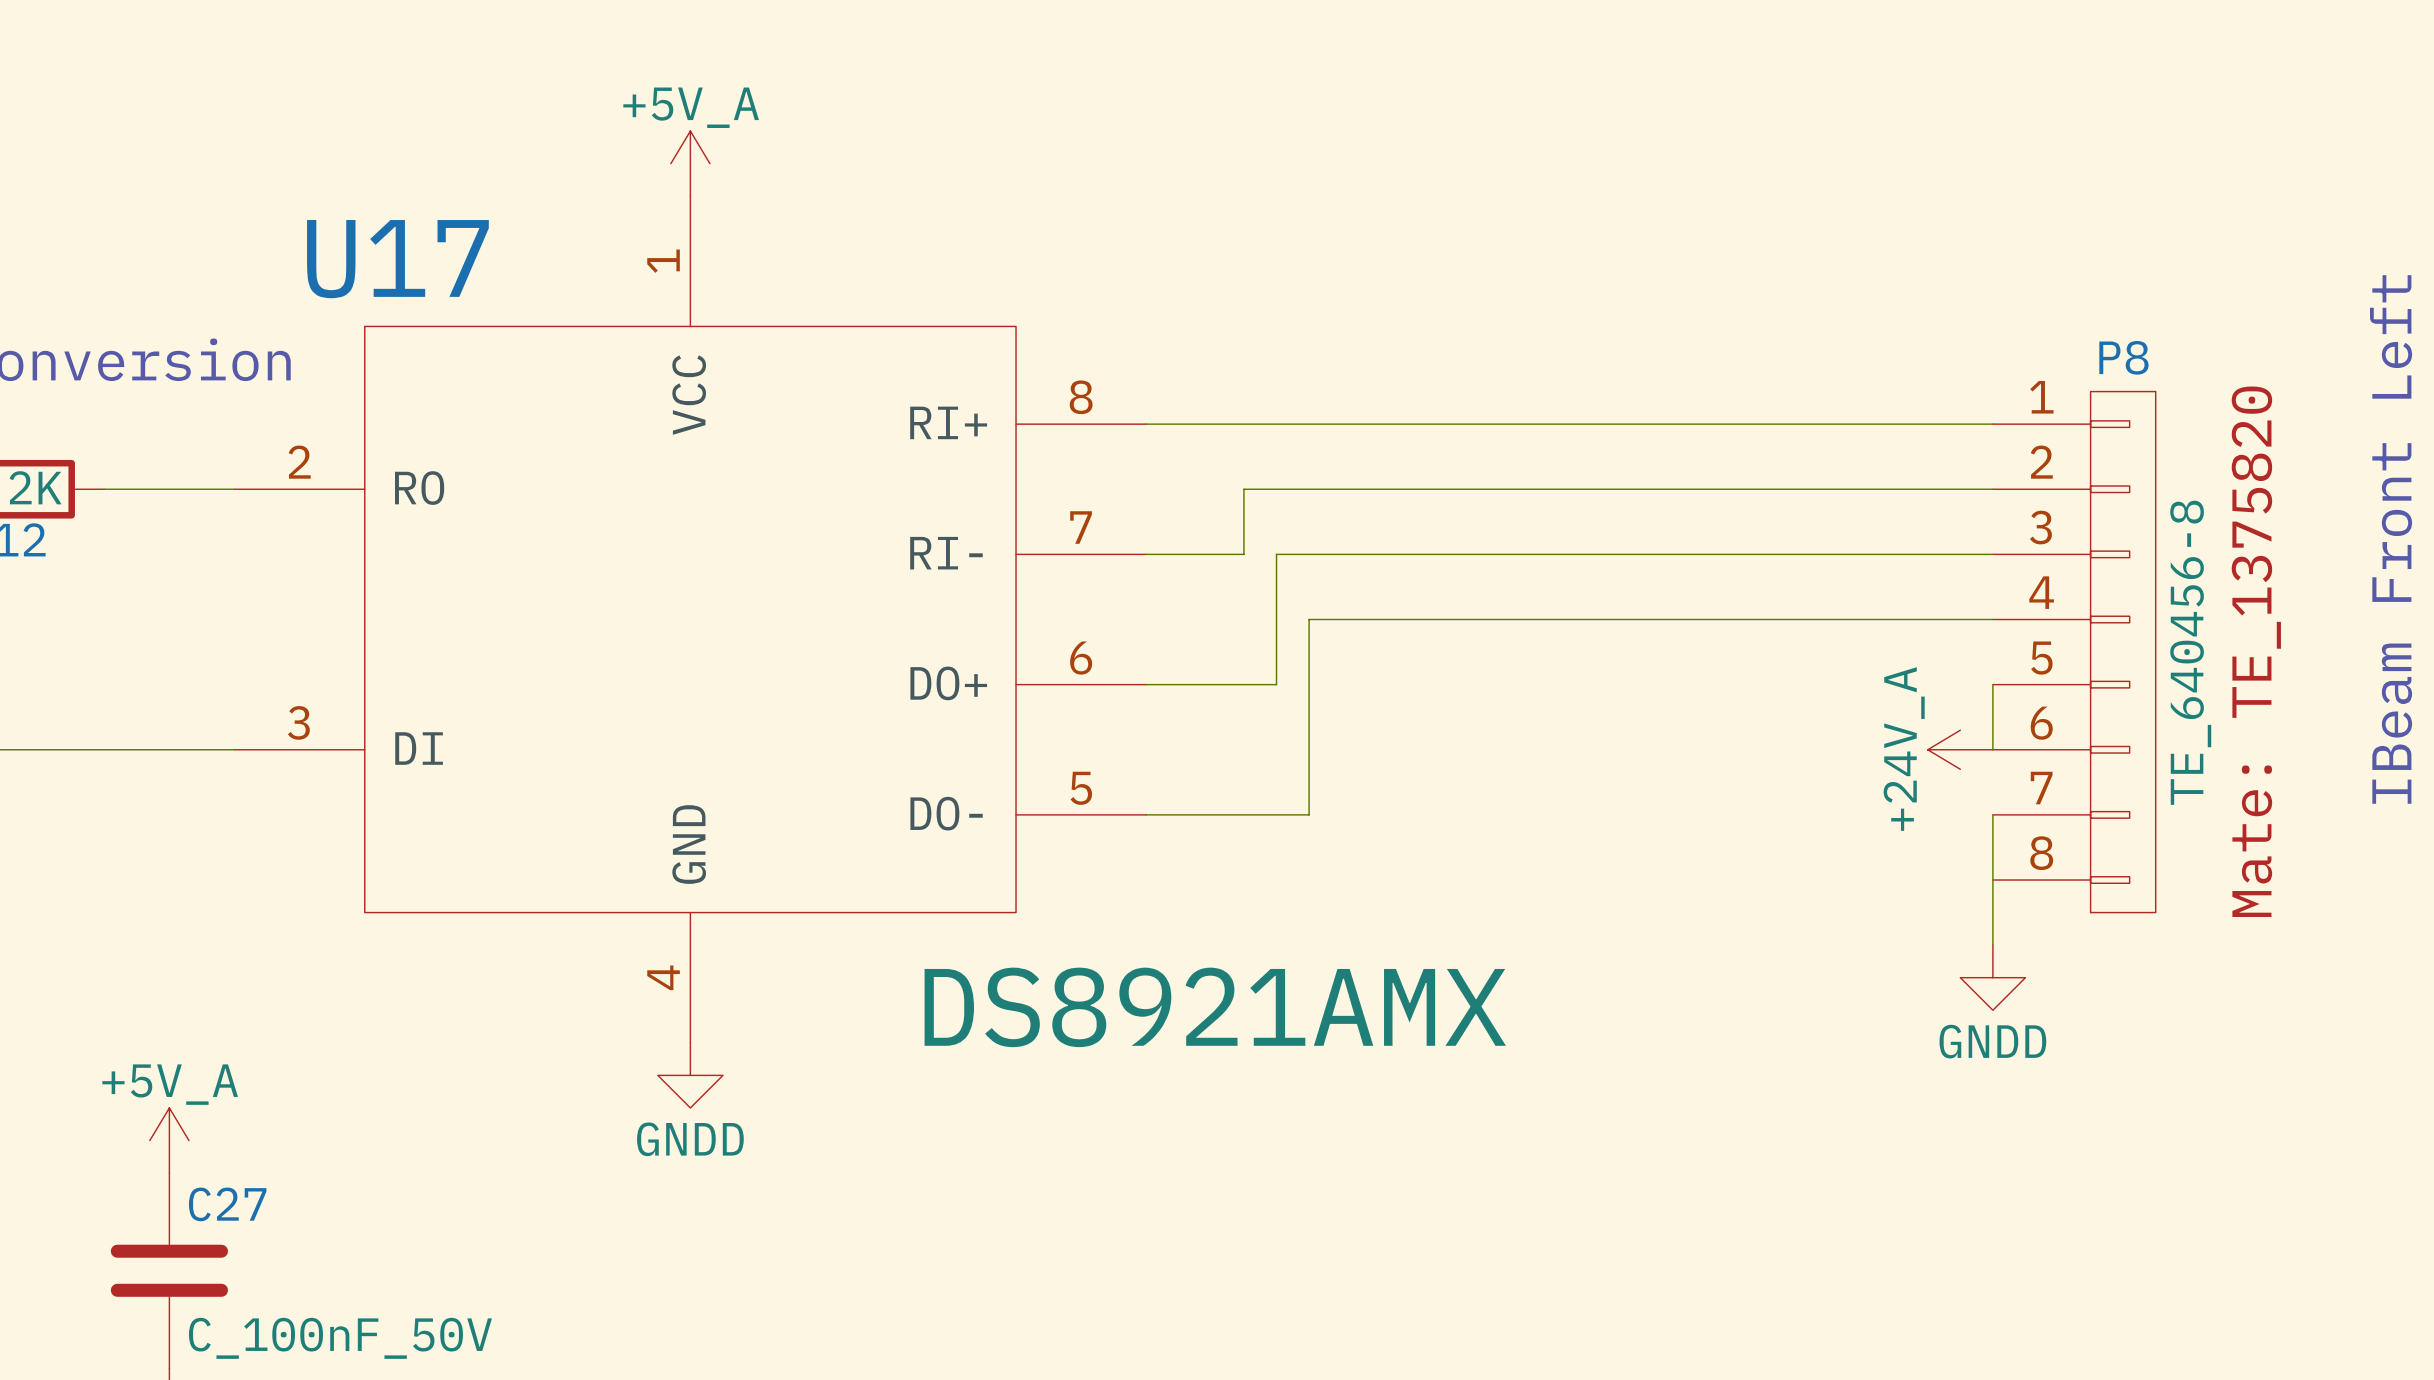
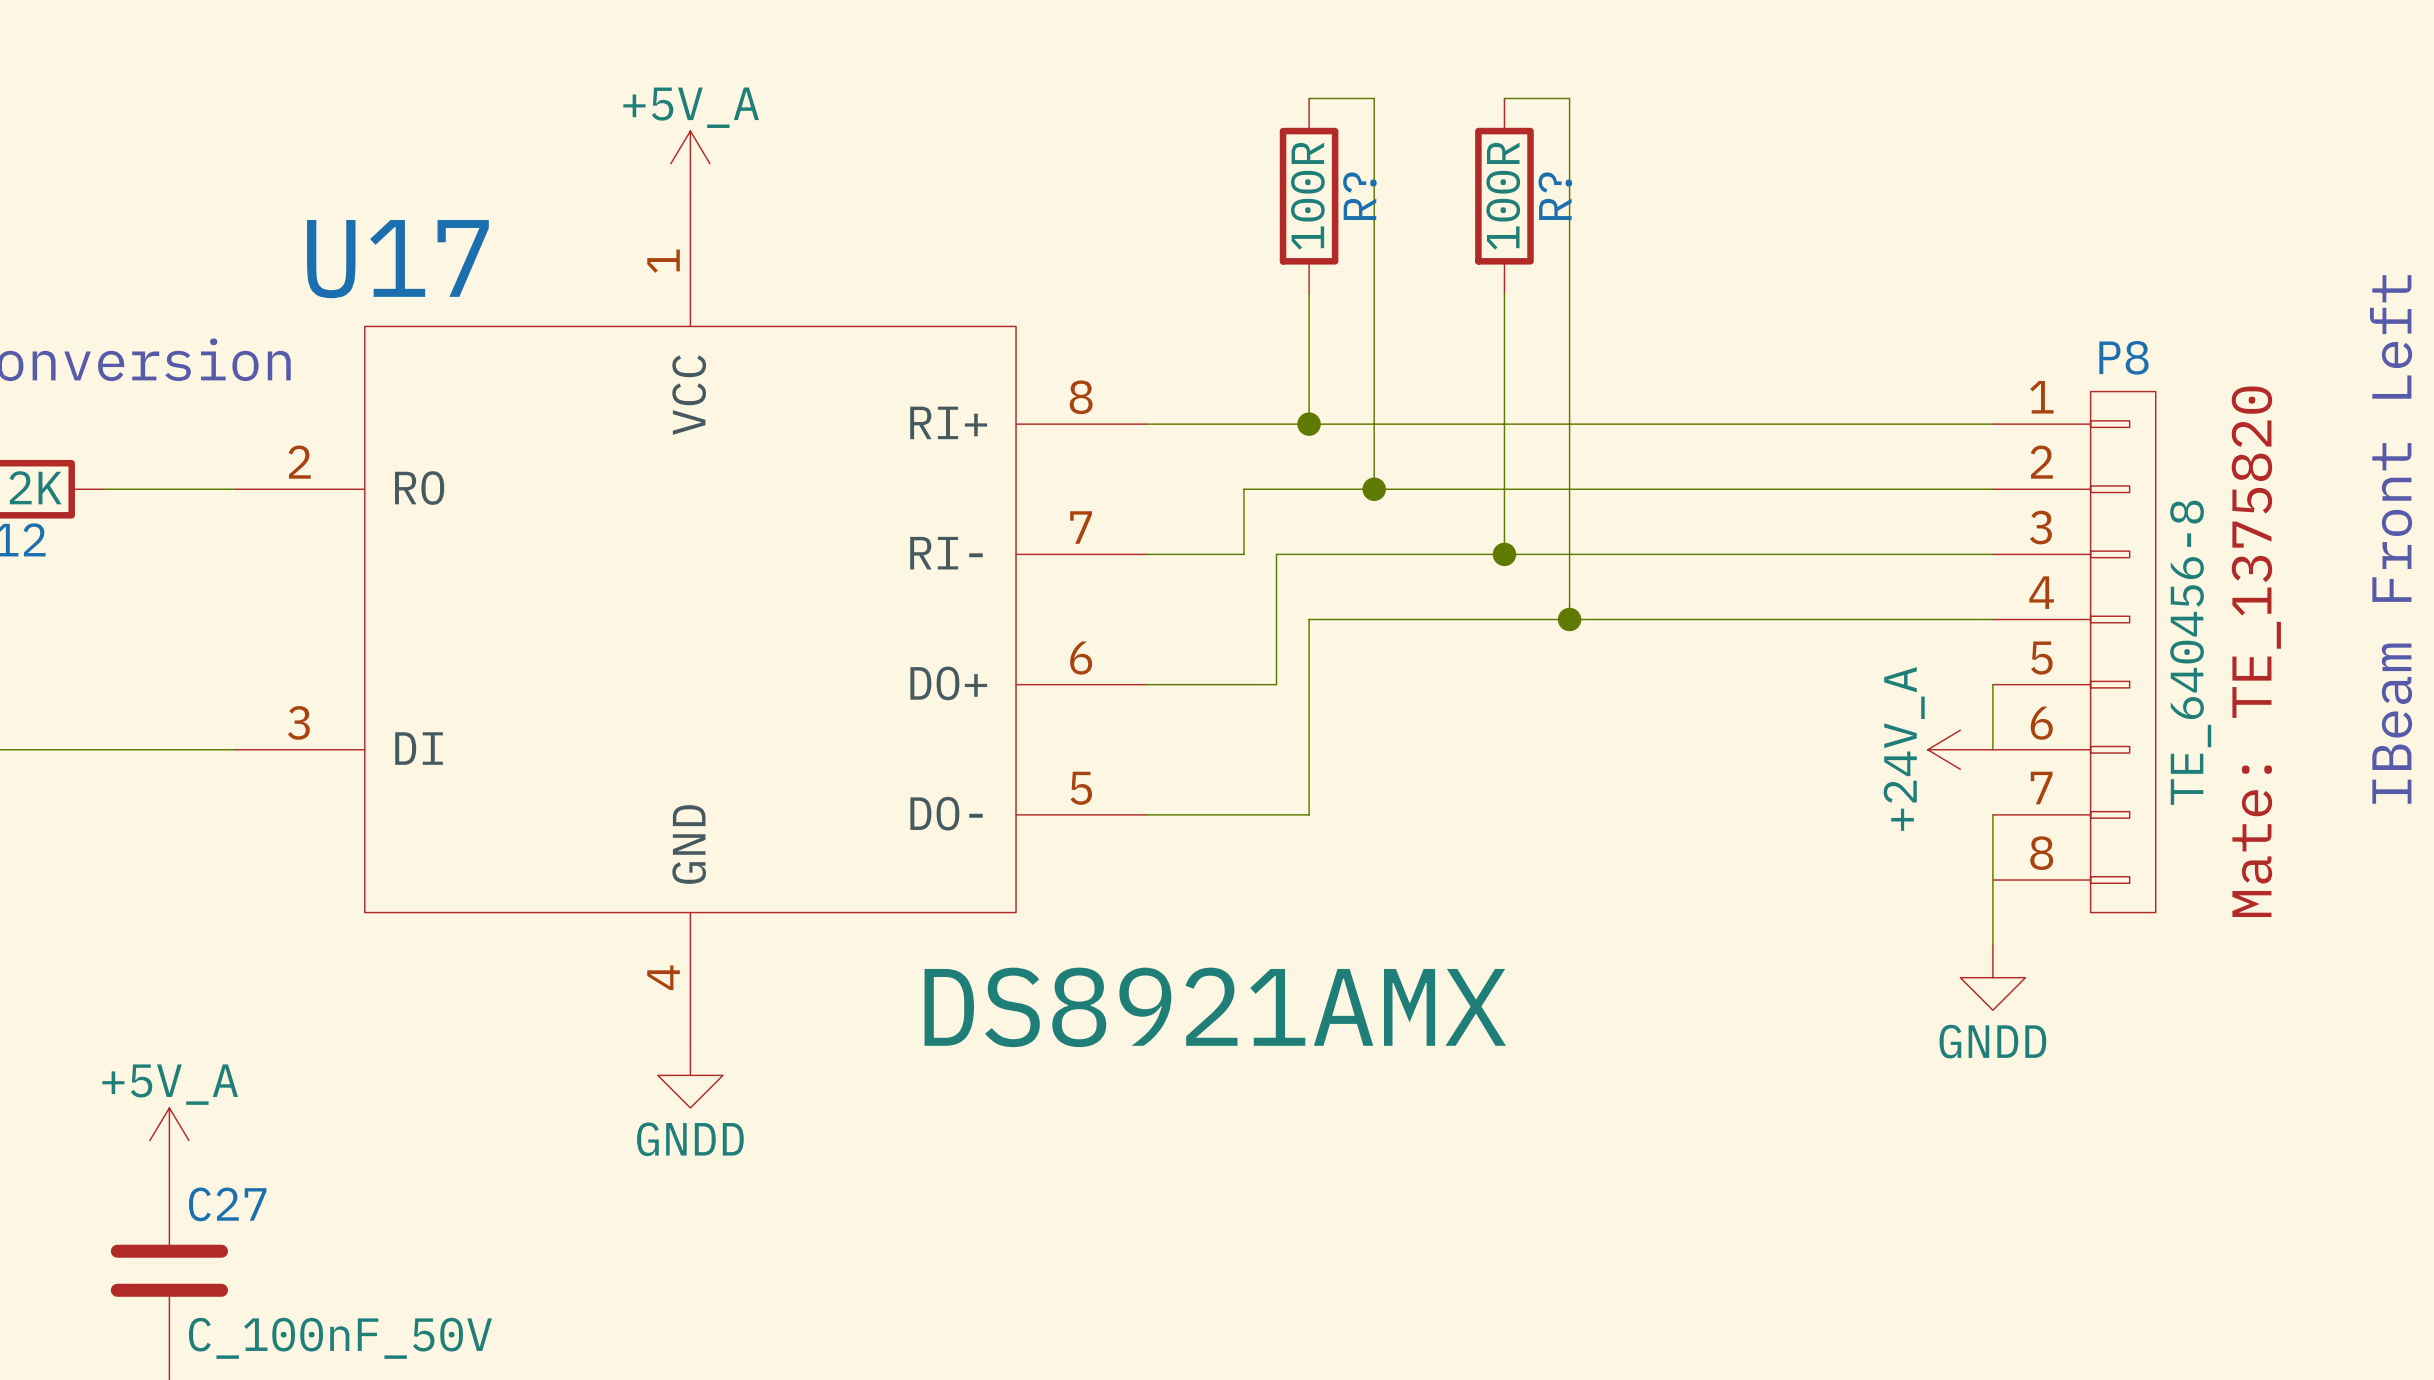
wire: none -> (1309, 98) (1374, 98) (1374, 489)
wire: none -> (1504, 98) (1569, 98) (1569, 619)
R?: none -> 100R (1309, 196)
R?: none -> 100R (1504, 196)
wire: none -> (1309, 293) (1309, 424)
wire: none -> (1504, 293) (1504, 554)
junction: none -> (1309, 424)
junction: none -> (1374, 489)
junction: none -> (1504, 554)
junction: none -> (1569, 619)

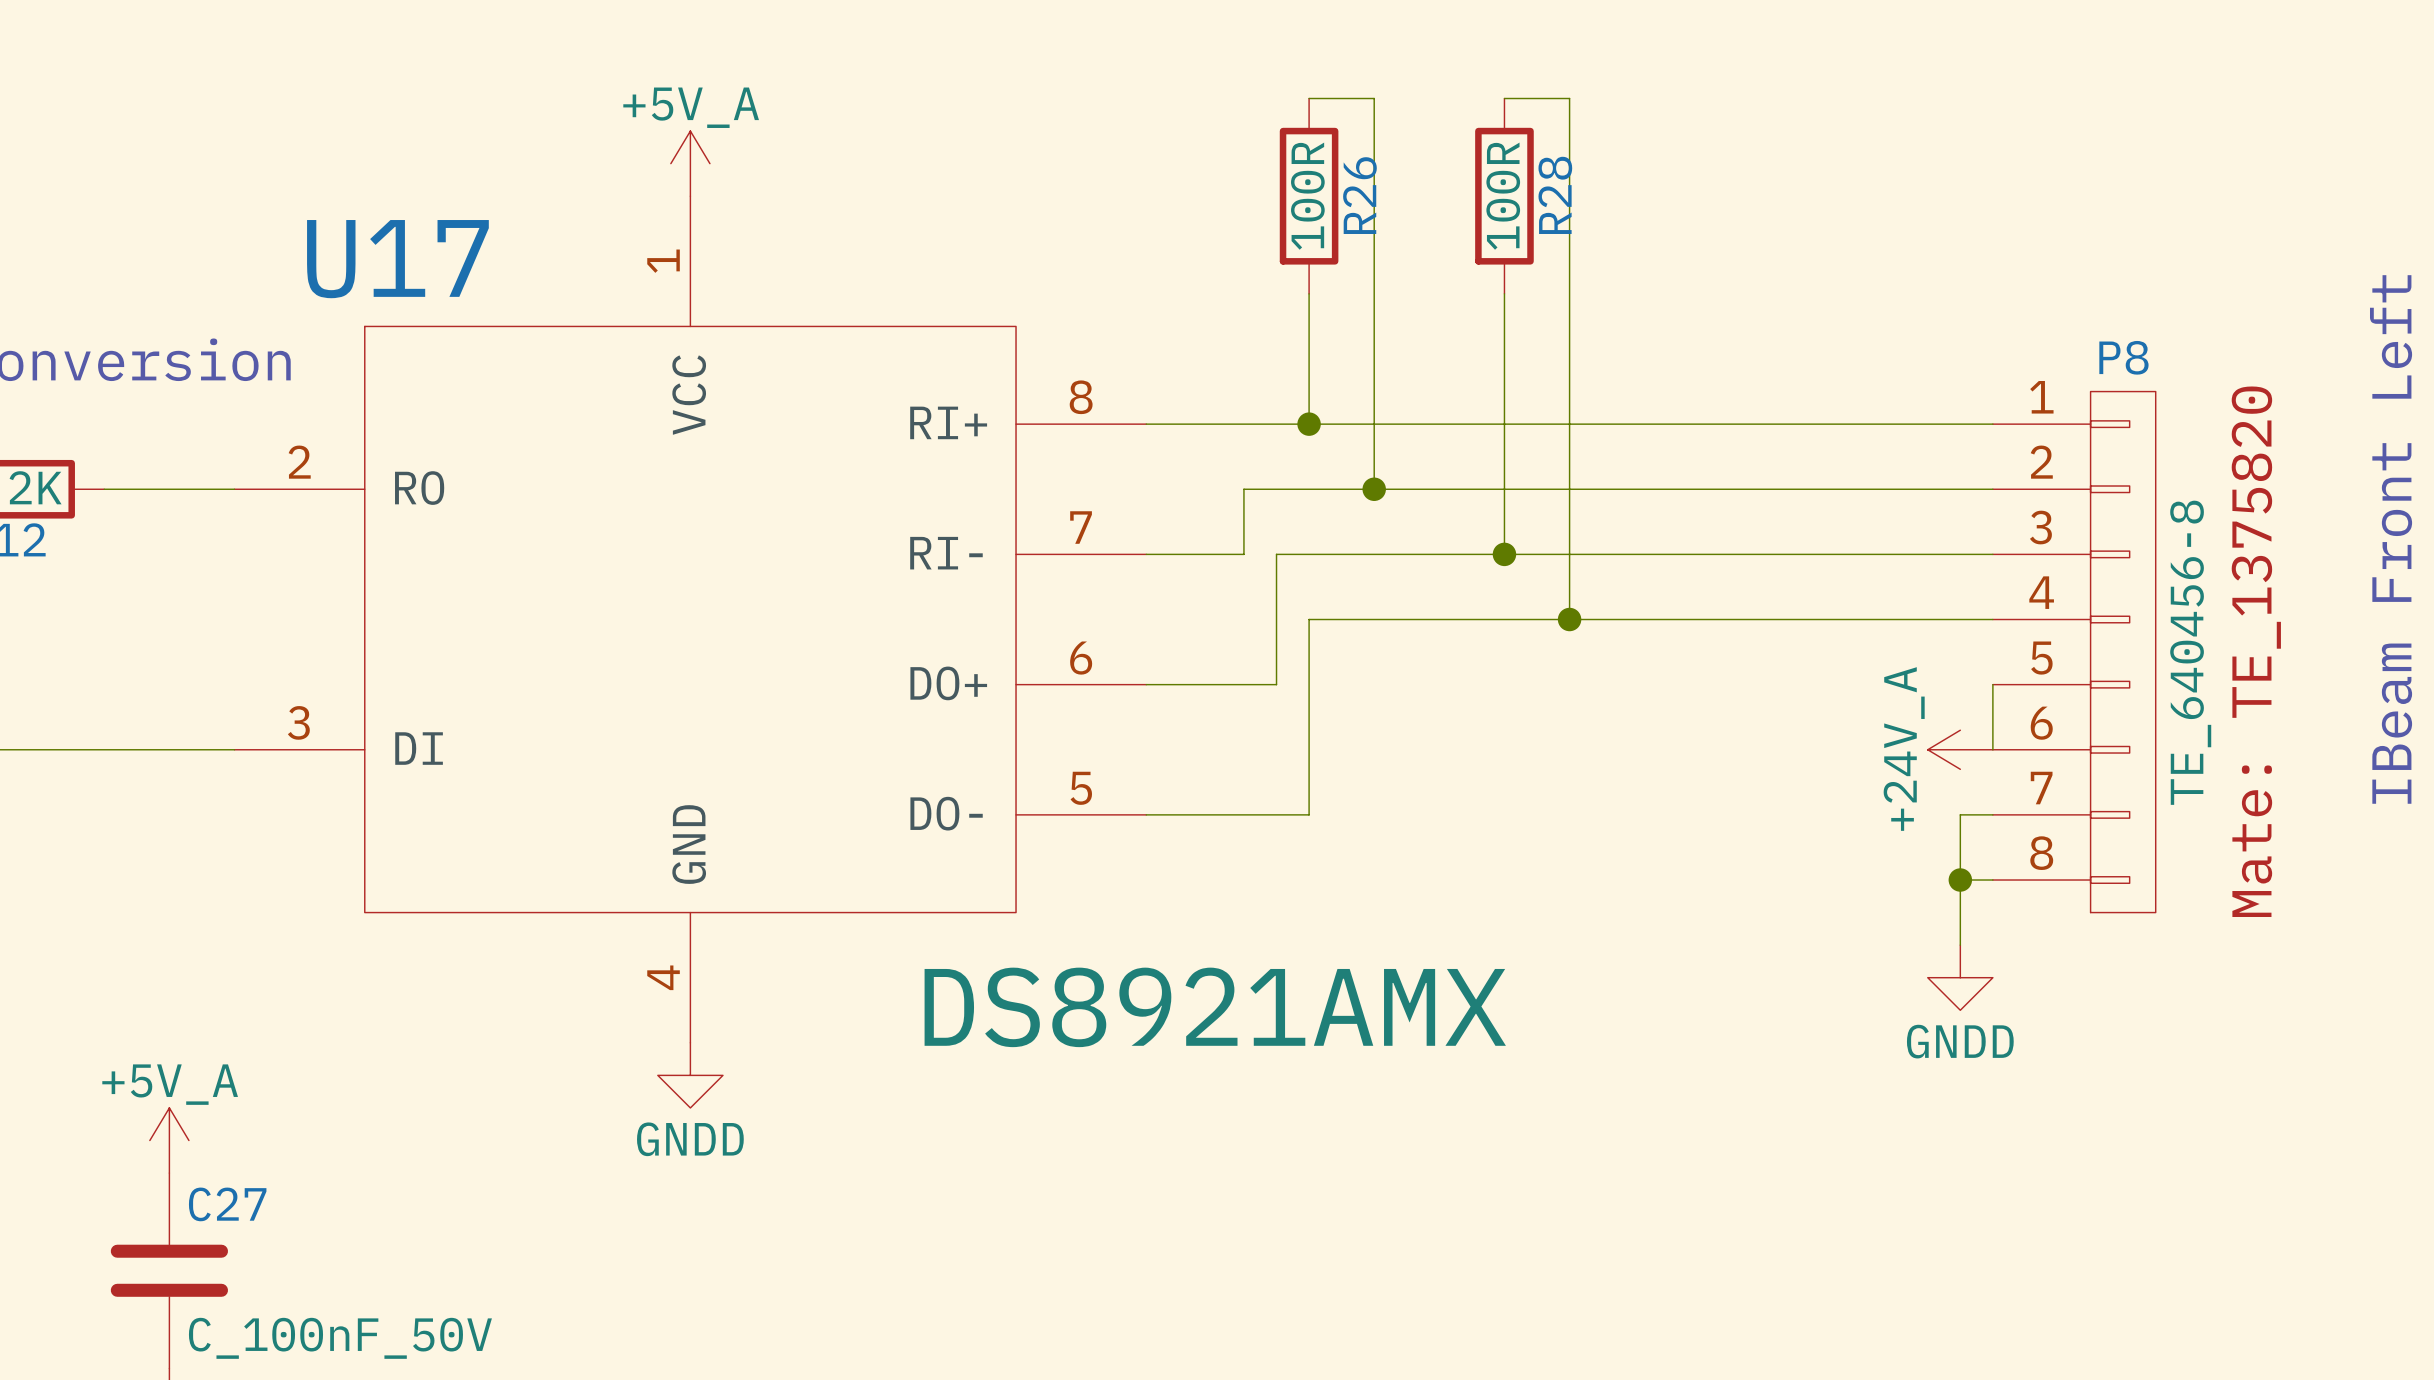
R? name: R? (1359, 196) -> R26 (1359, 195)
R? name: R? (1555, 196) -> R28 (1555, 195)
wire: (1992, 814) (1992, 945) -> (1992, 814) (1960, 814) (1960, 945)
wire: none -> (1960, 880) (1992, 880)
junction: none -> (1960, 880)
power symbol position: GNDD (1992, 977) -> GNDD (1960, 977)

